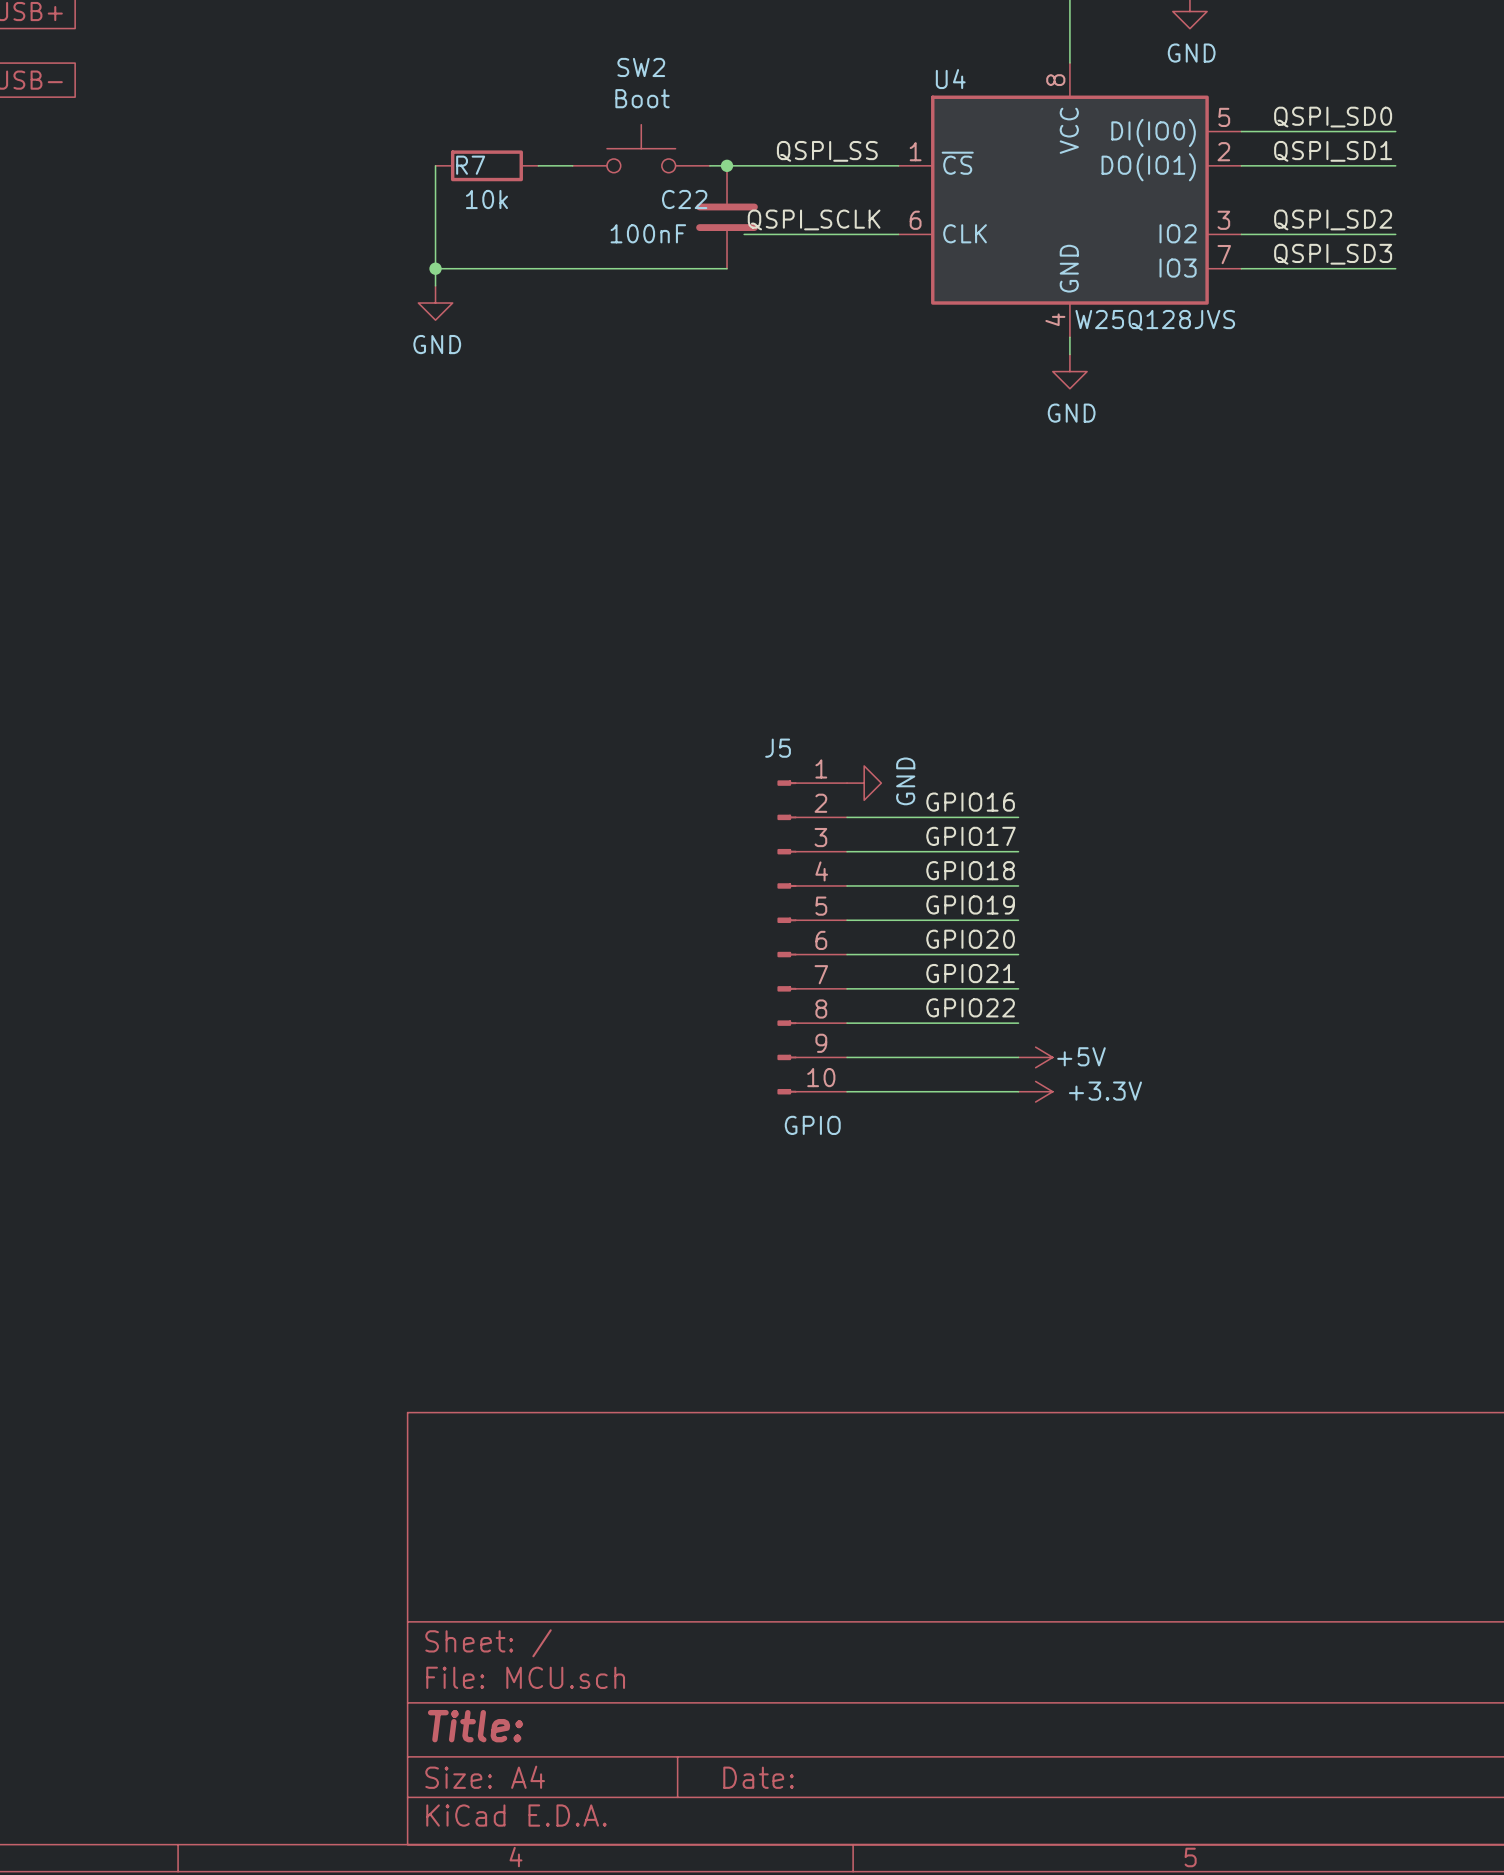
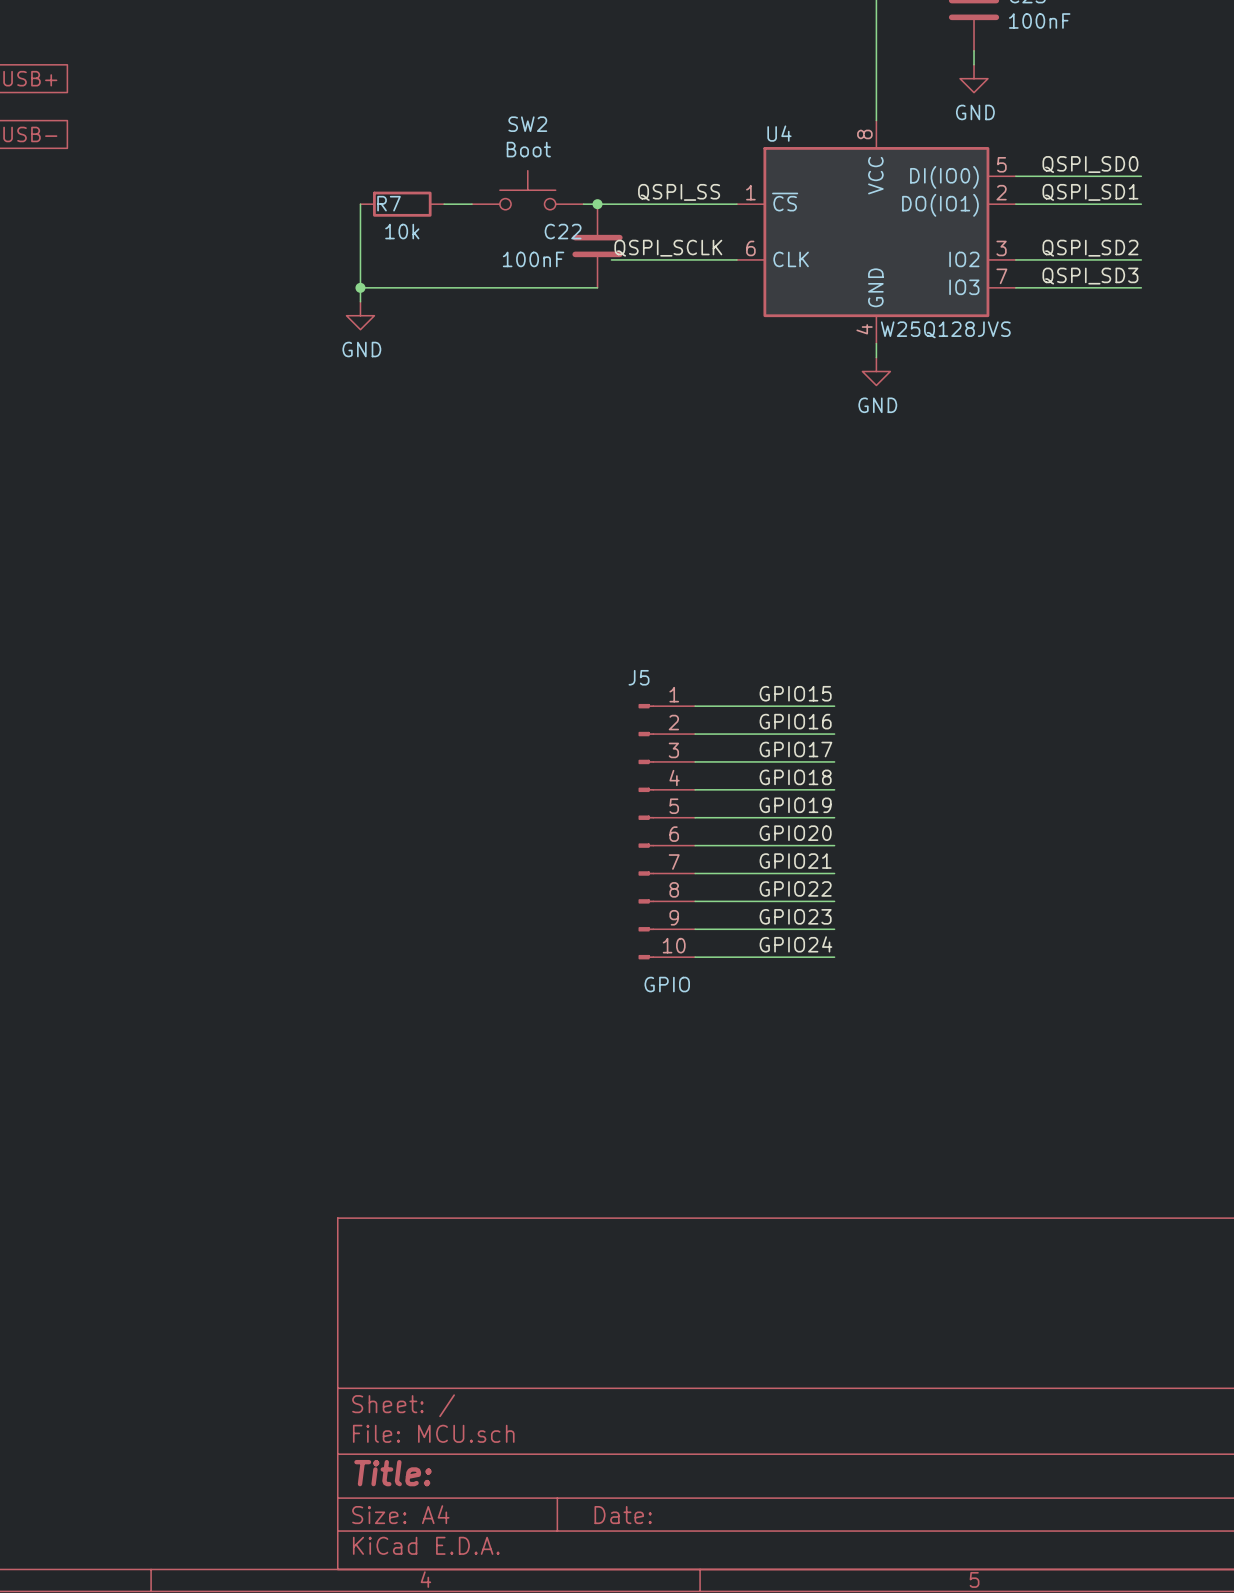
label: none -> GPIO15 (795, 693)
wire: none -> (695, 706) (834, 706)
power symbol: GND (864, 783) -> none
label: none -> GPIO23 (795, 916)
power symbol: +5V (1035, 1057) -> none
label: none -> GPIO24 (795, 944)
power symbol: +3.3V (1035, 1091) -> none

